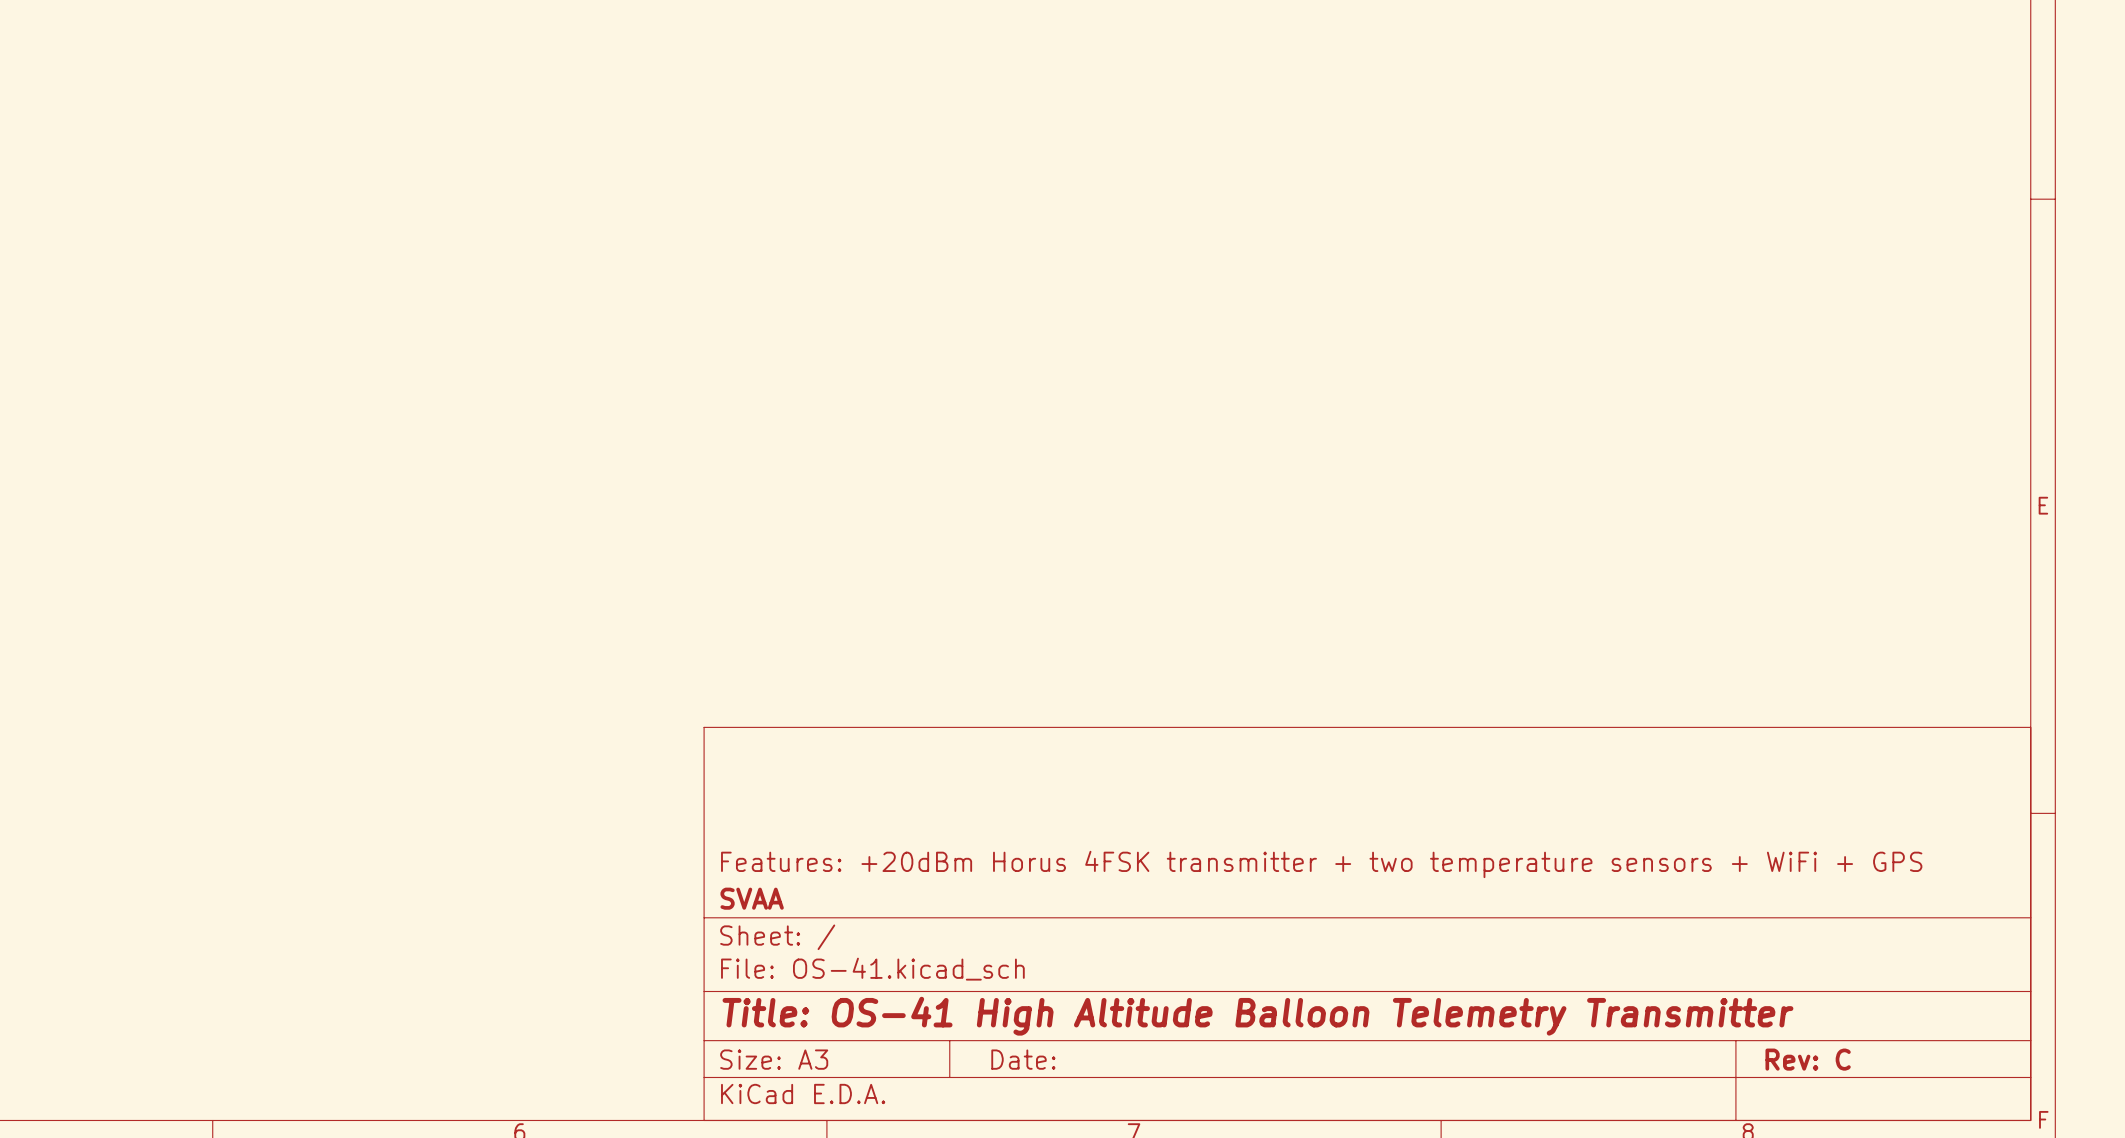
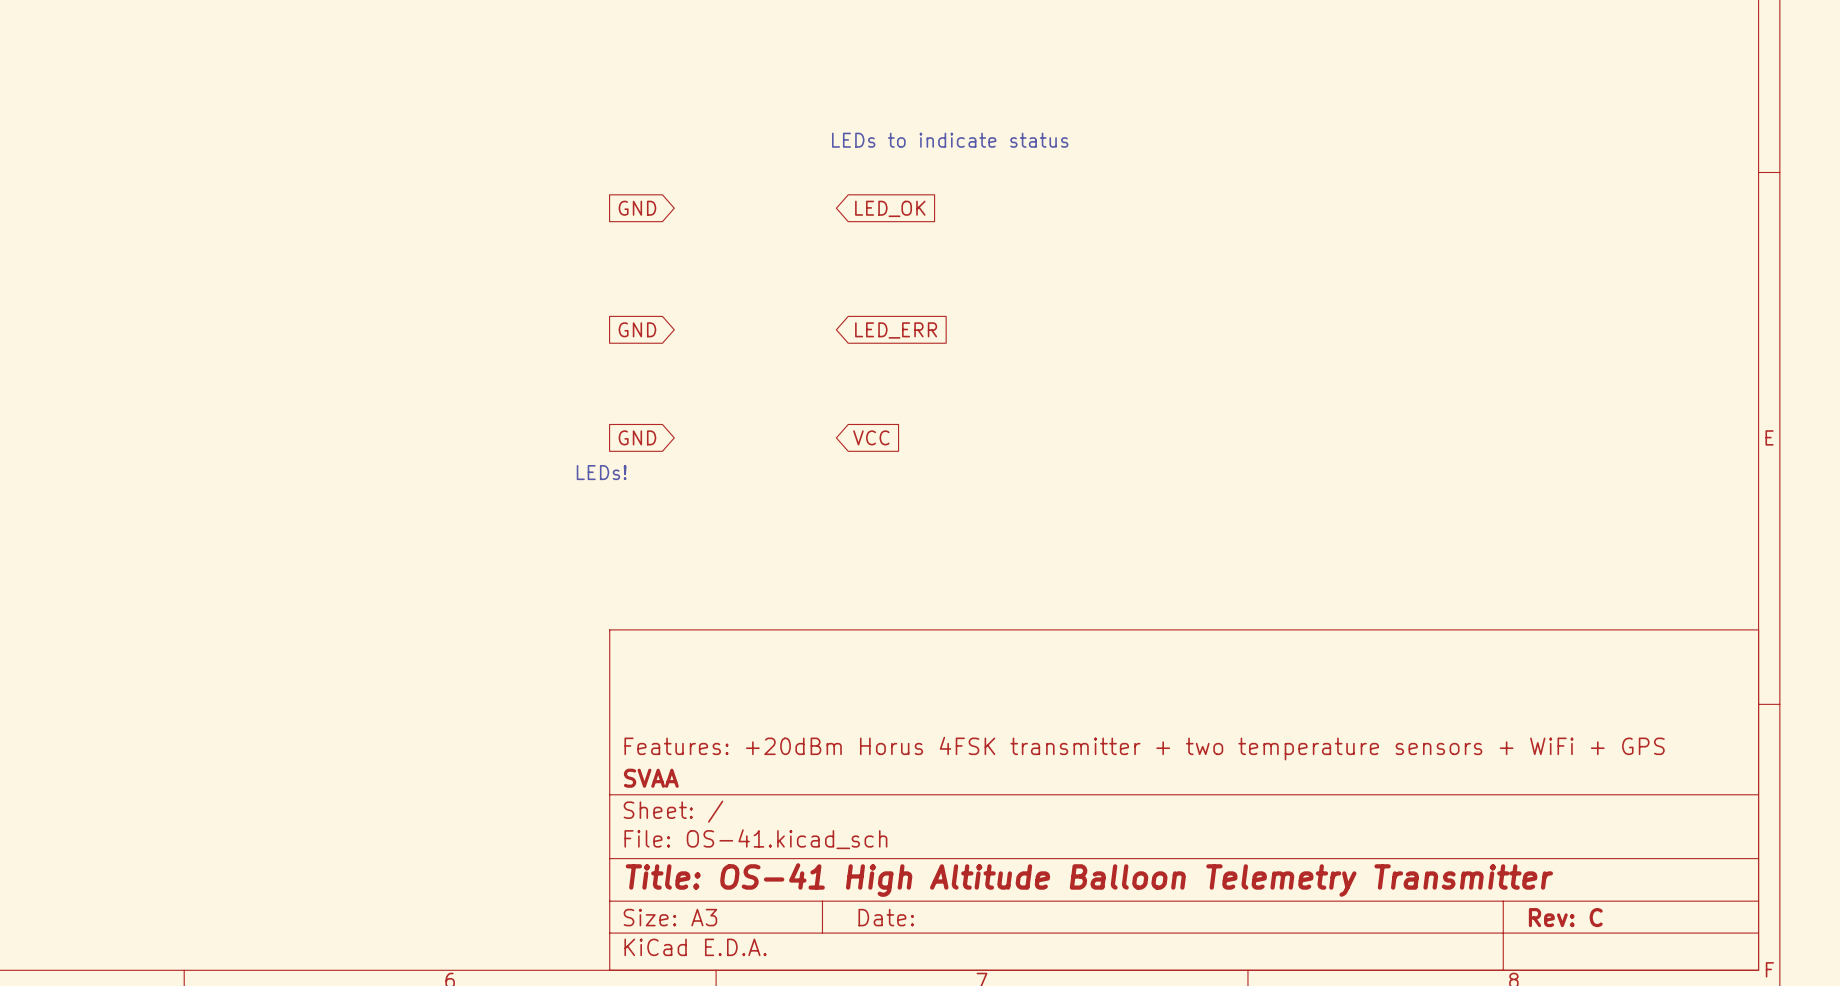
text: none -> LEDs to indicate status (950, 140)
global label: none -> GND (637, 208)
global label: none -> LED_OK (890, 208)
global label: none -> GND (637, 329)
global label: none -> LED_ERR (896, 330)
global label: none -> GND (637, 437)
global label: none -> VCC (871, 437)
text: none -> LEDs! (601, 472)

